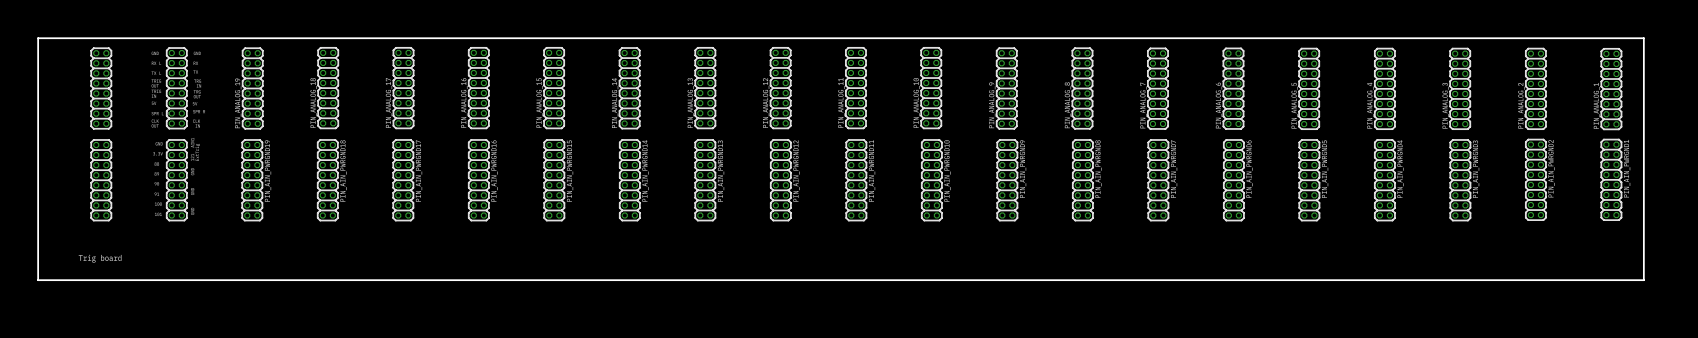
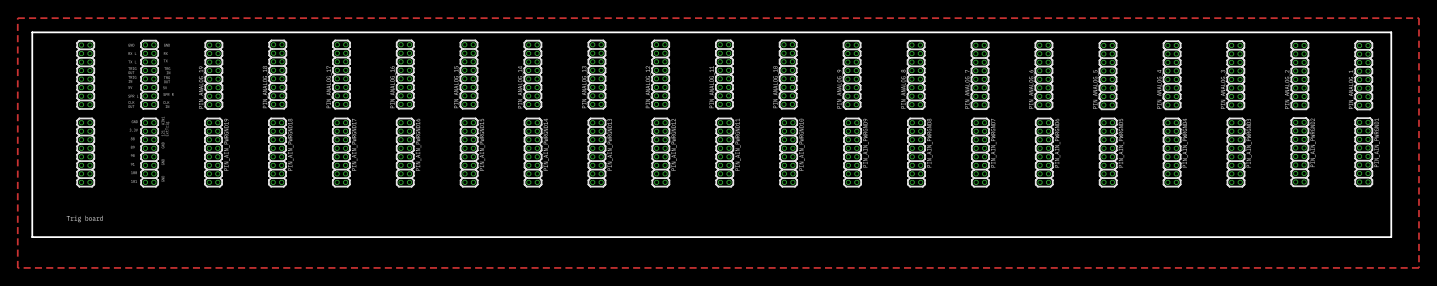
zone outline: none -> (17, 18) (17, 267) (1418, 267) (1418, 18) (17, 18)

